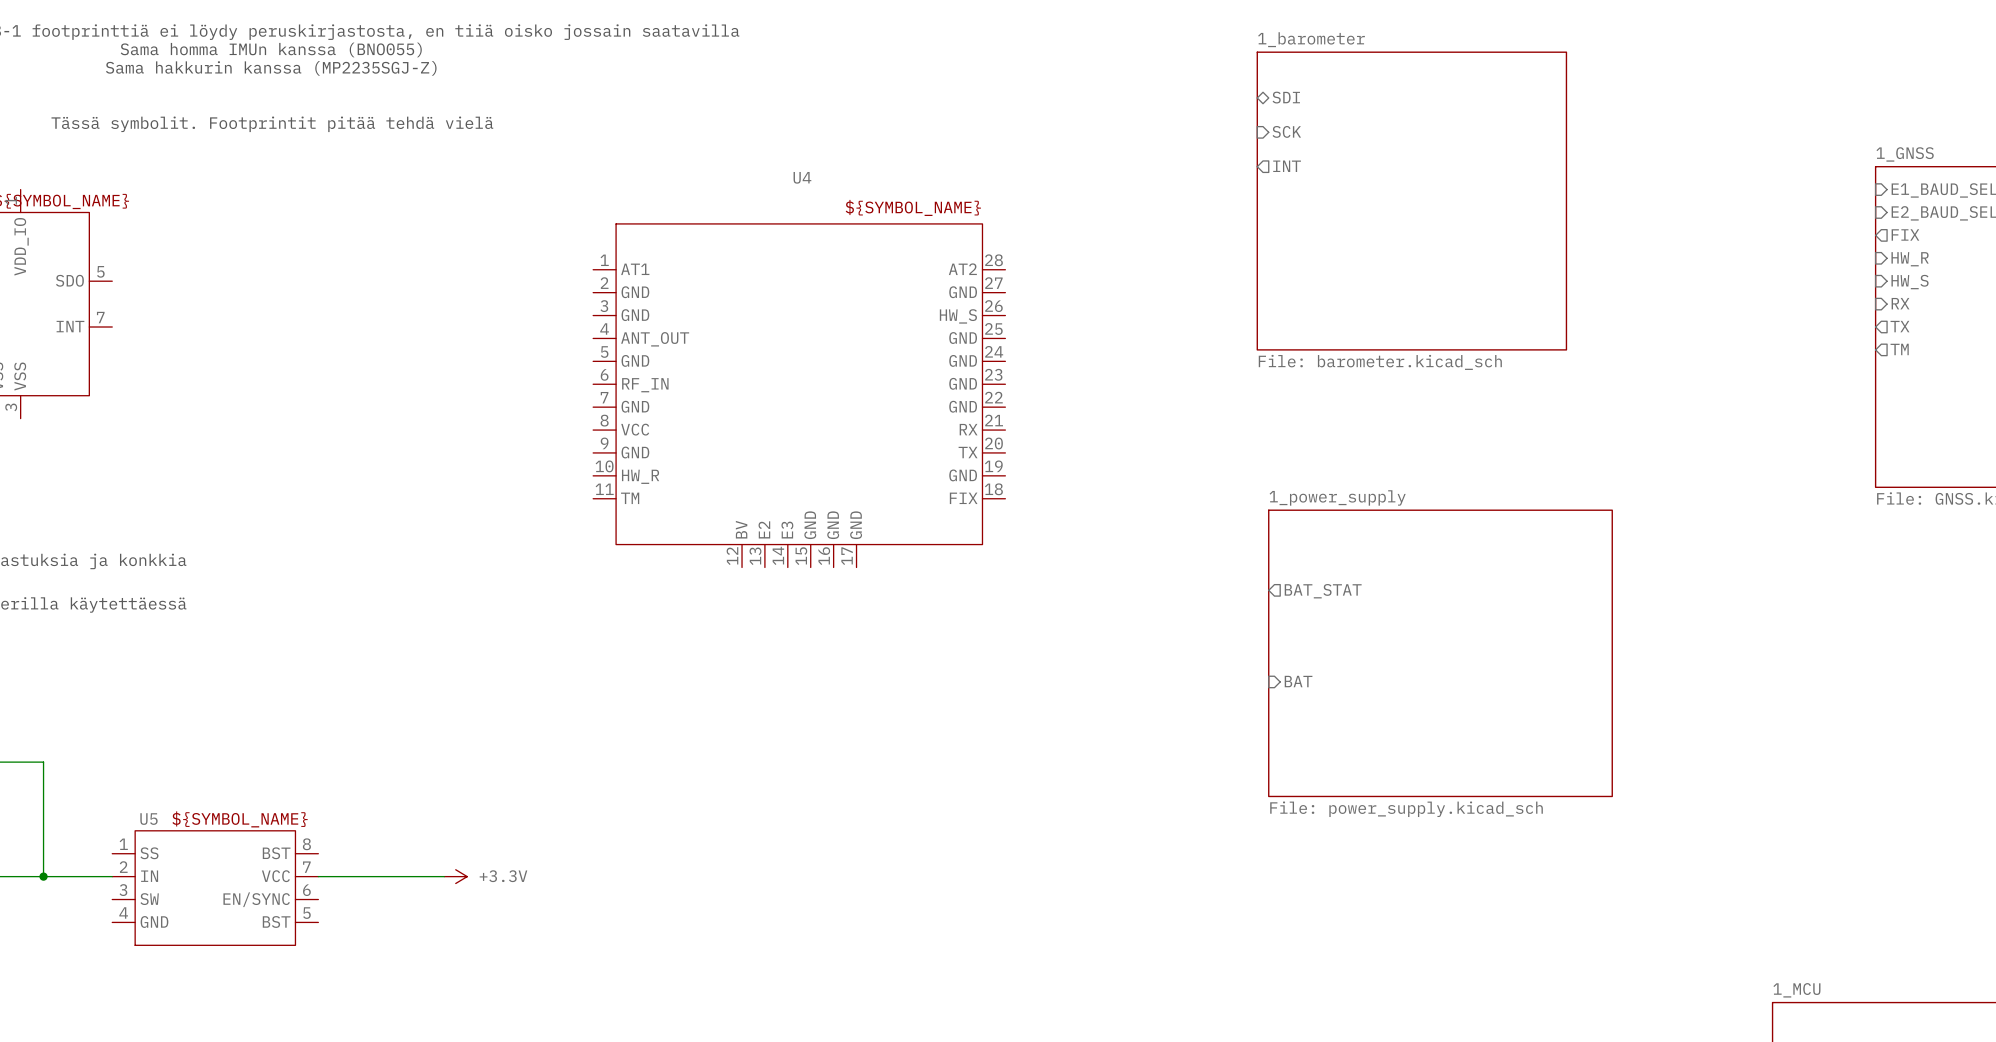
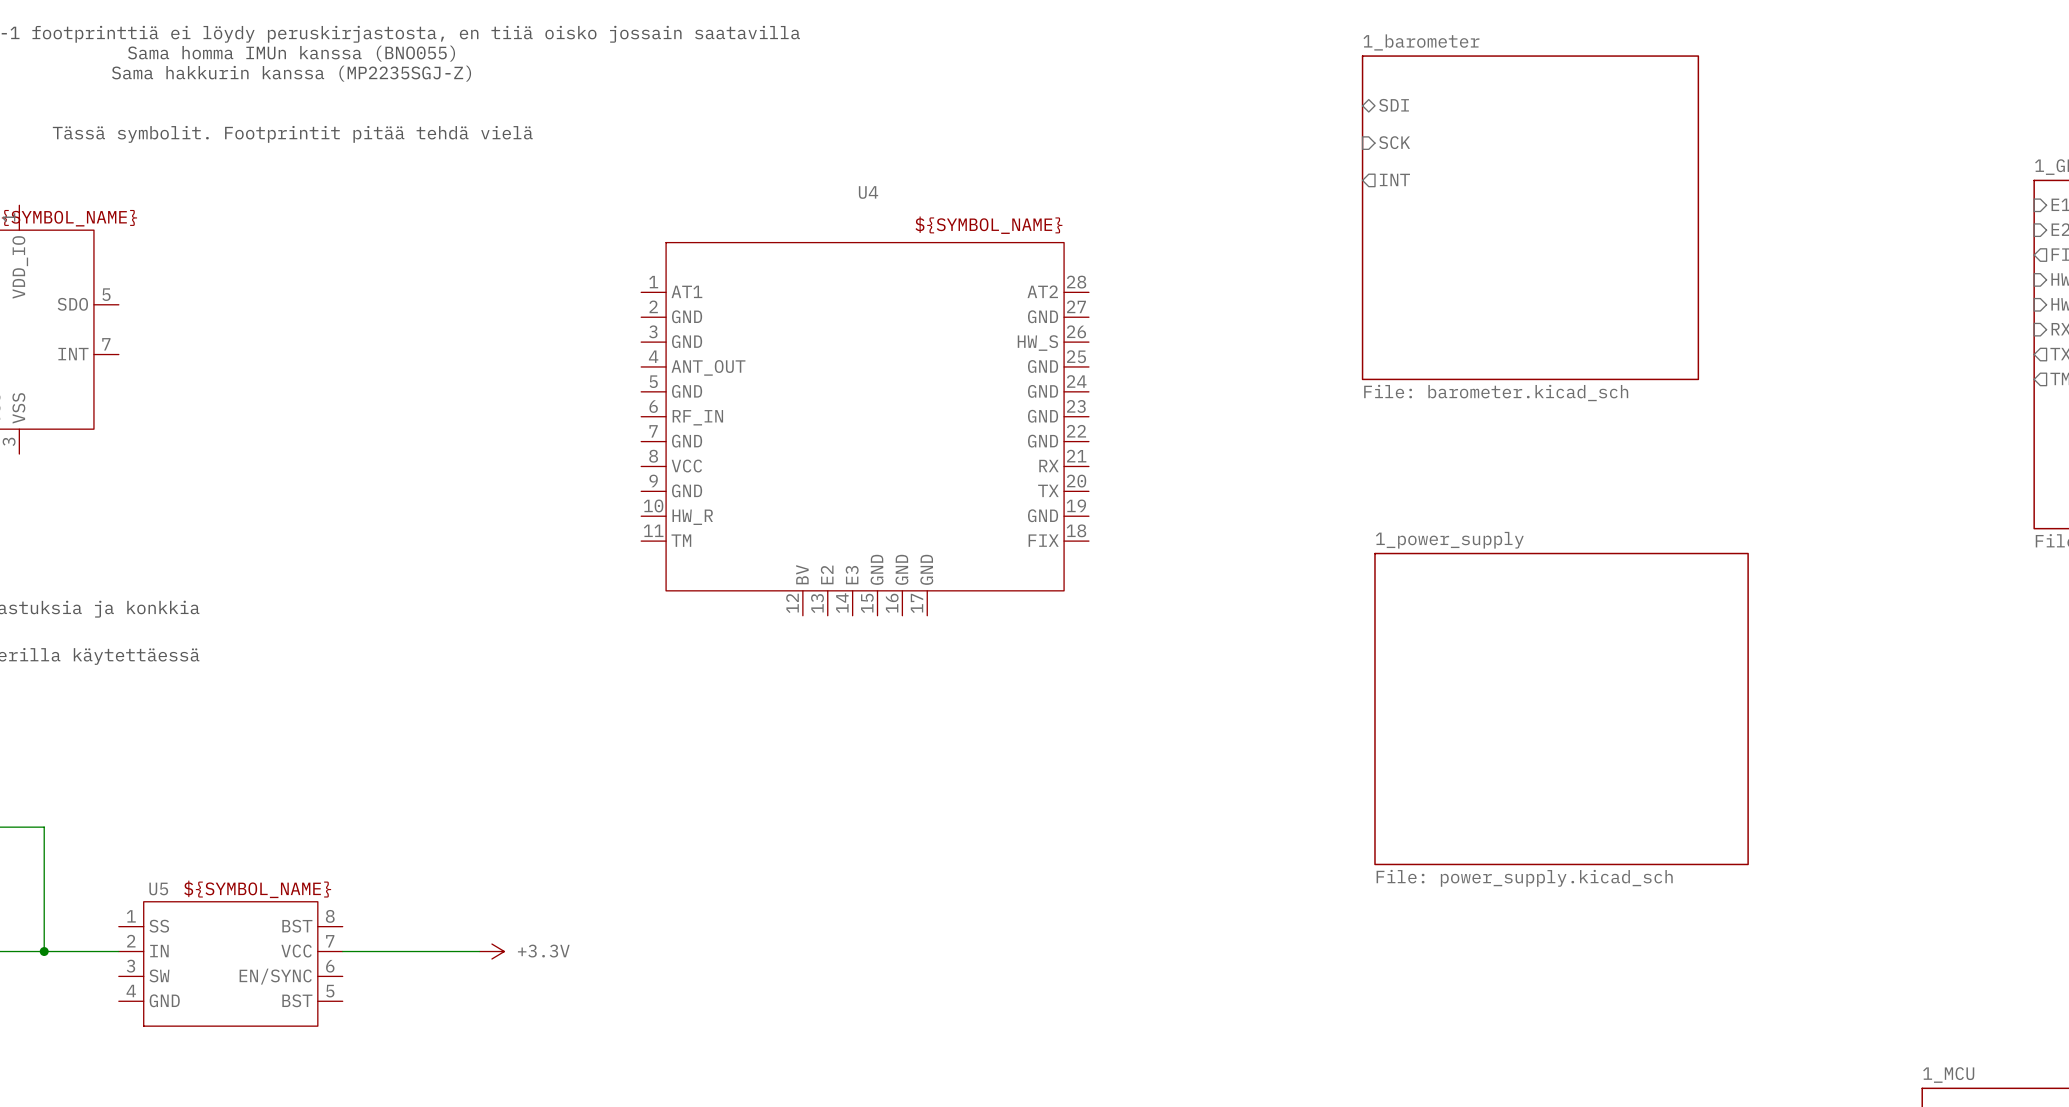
sheet pin: BAT_STAT (1323, 591) -> none
sheet pin: BAT (1298, 681) -> none

